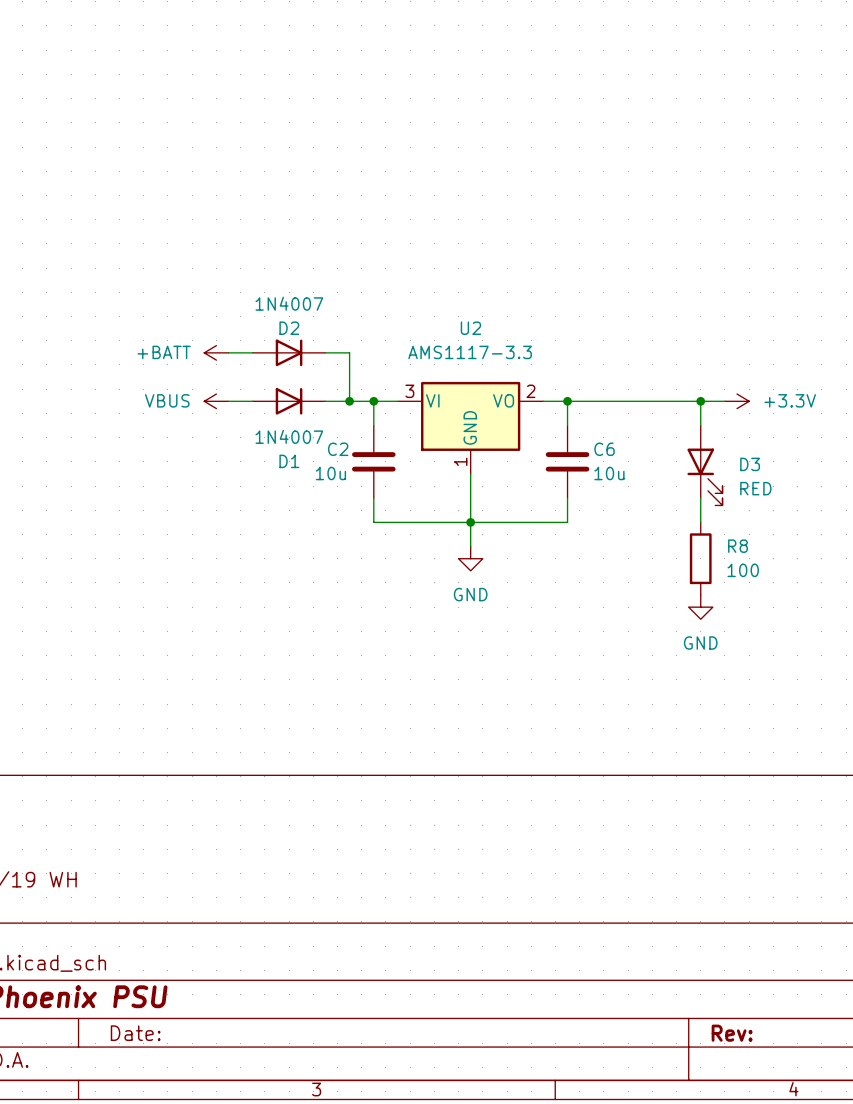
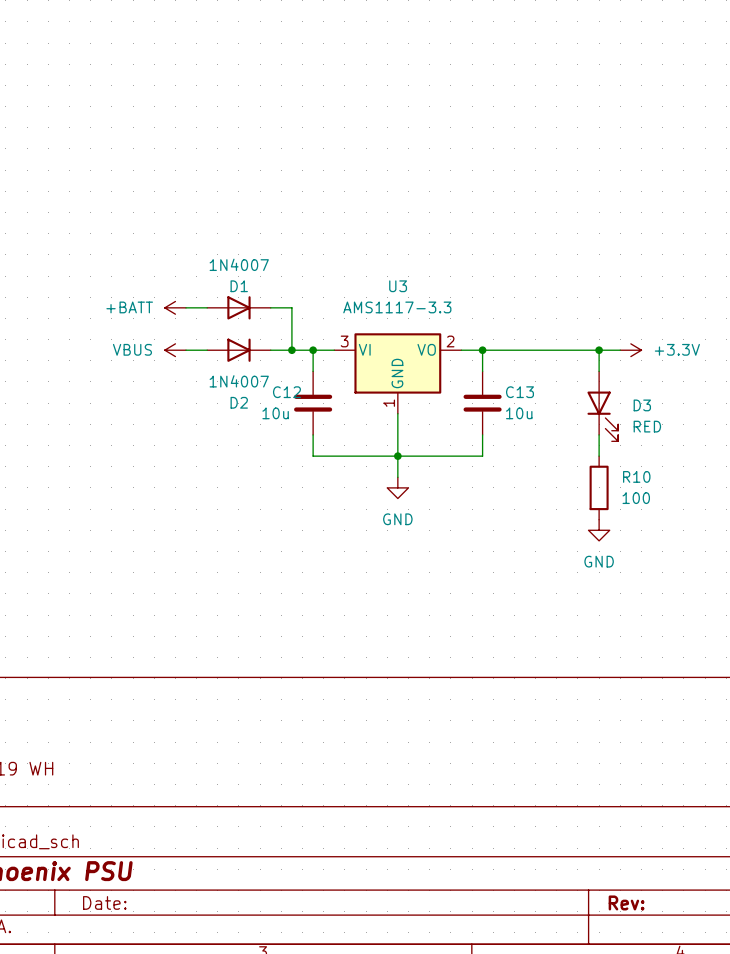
D2 name: D2 (289, 328) -> D1 (239, 286)
U2 name: U2 (470, 328) -> U3 (398, 286)
C2 name: C2 (338, 449) -> C12 (286, 392)
C6 name: C6 (604, 449) -> C13 (519, 392)
D1 name: D1 (289, 461) -> D2 (239, 402)
R8 name: R8 (738, 546) -> R10 (636, 476)

